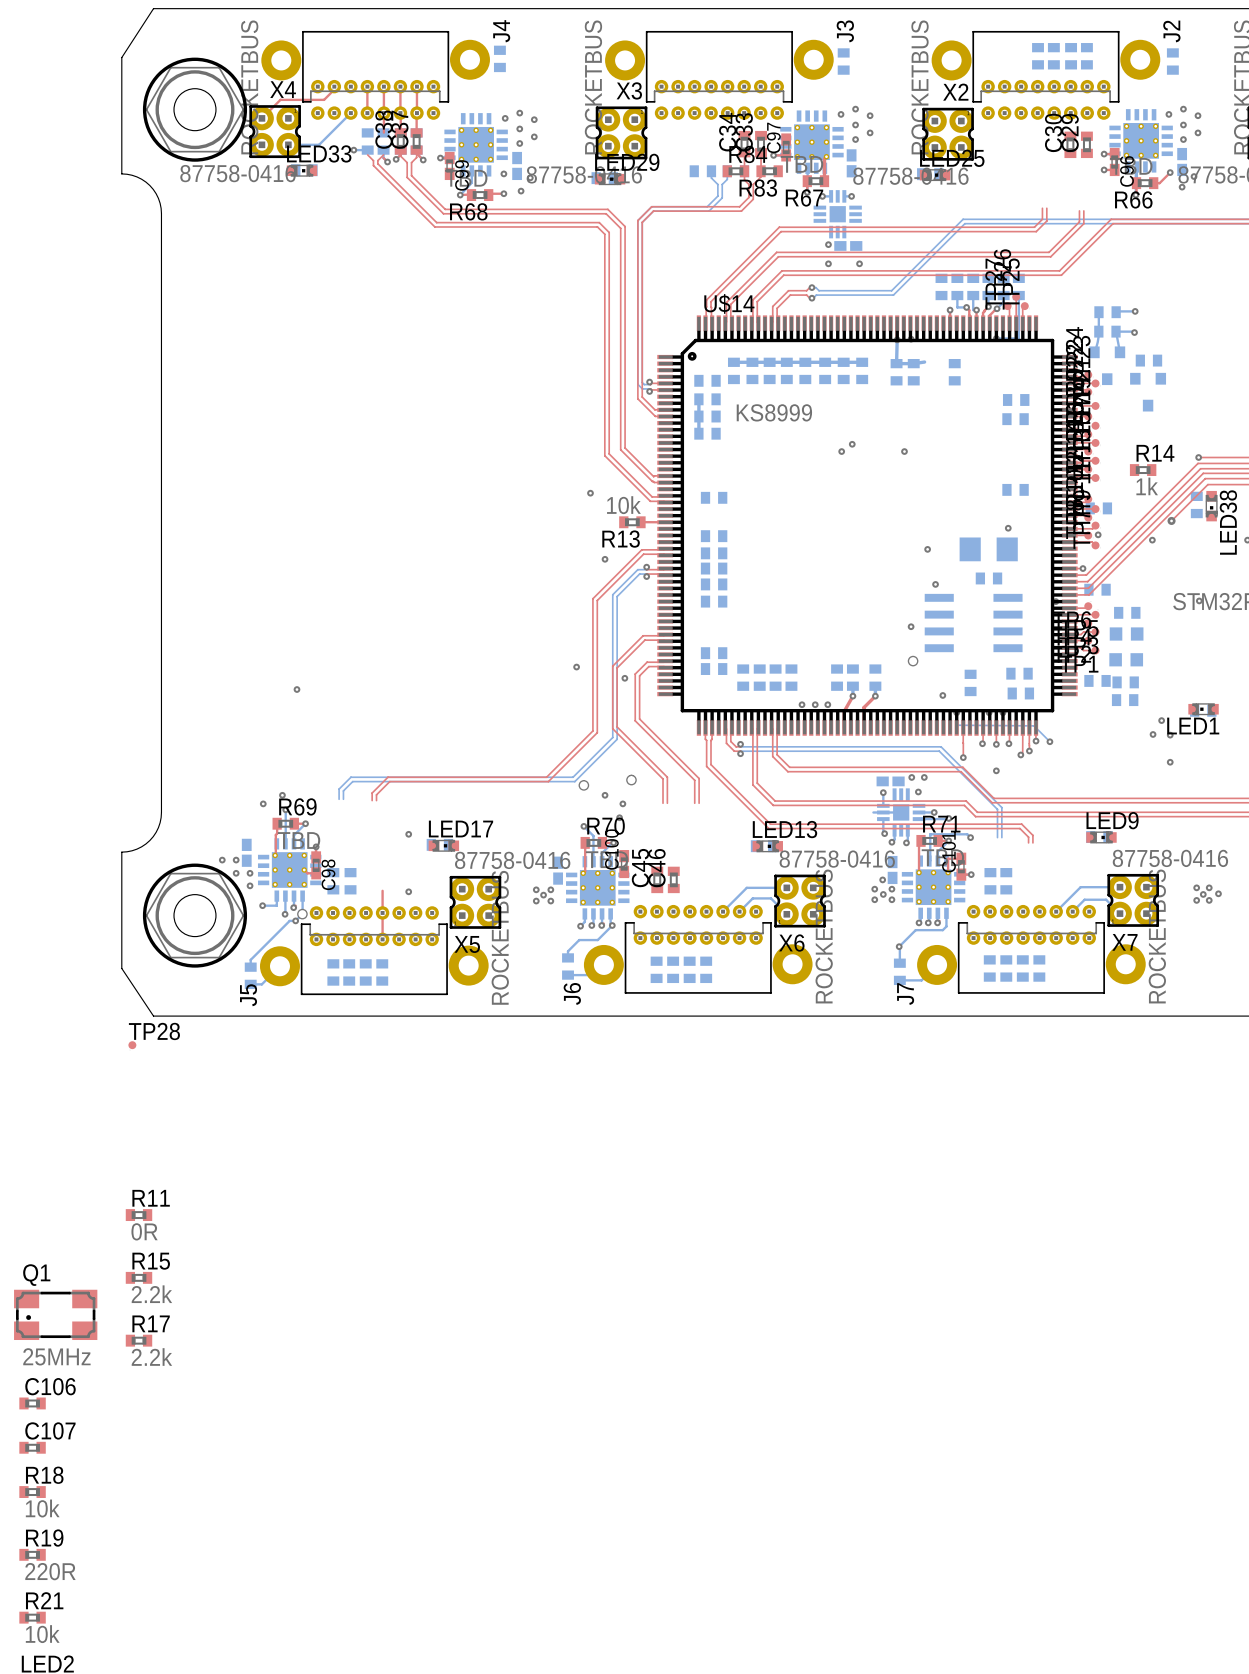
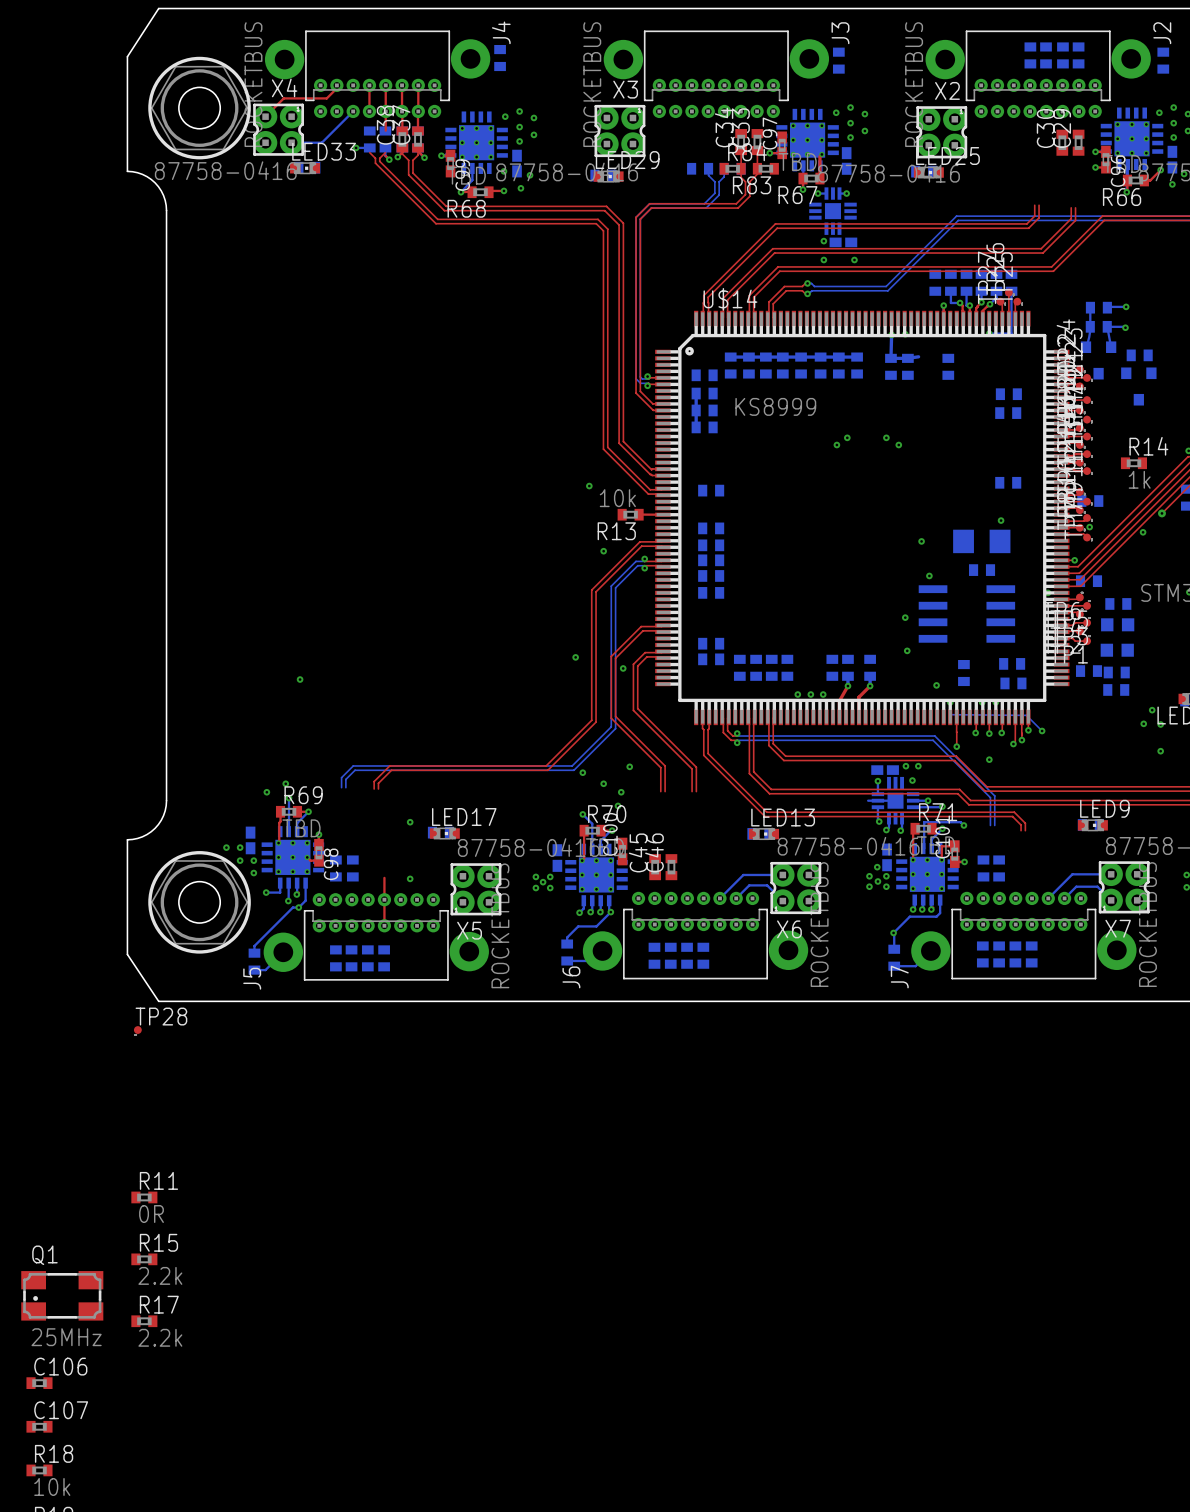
via: none -> (886, 437)
via: (913, 661) -> none
via: (631, 780) -> none
via: (583, 785) -> none
via: (302, 914) -> none

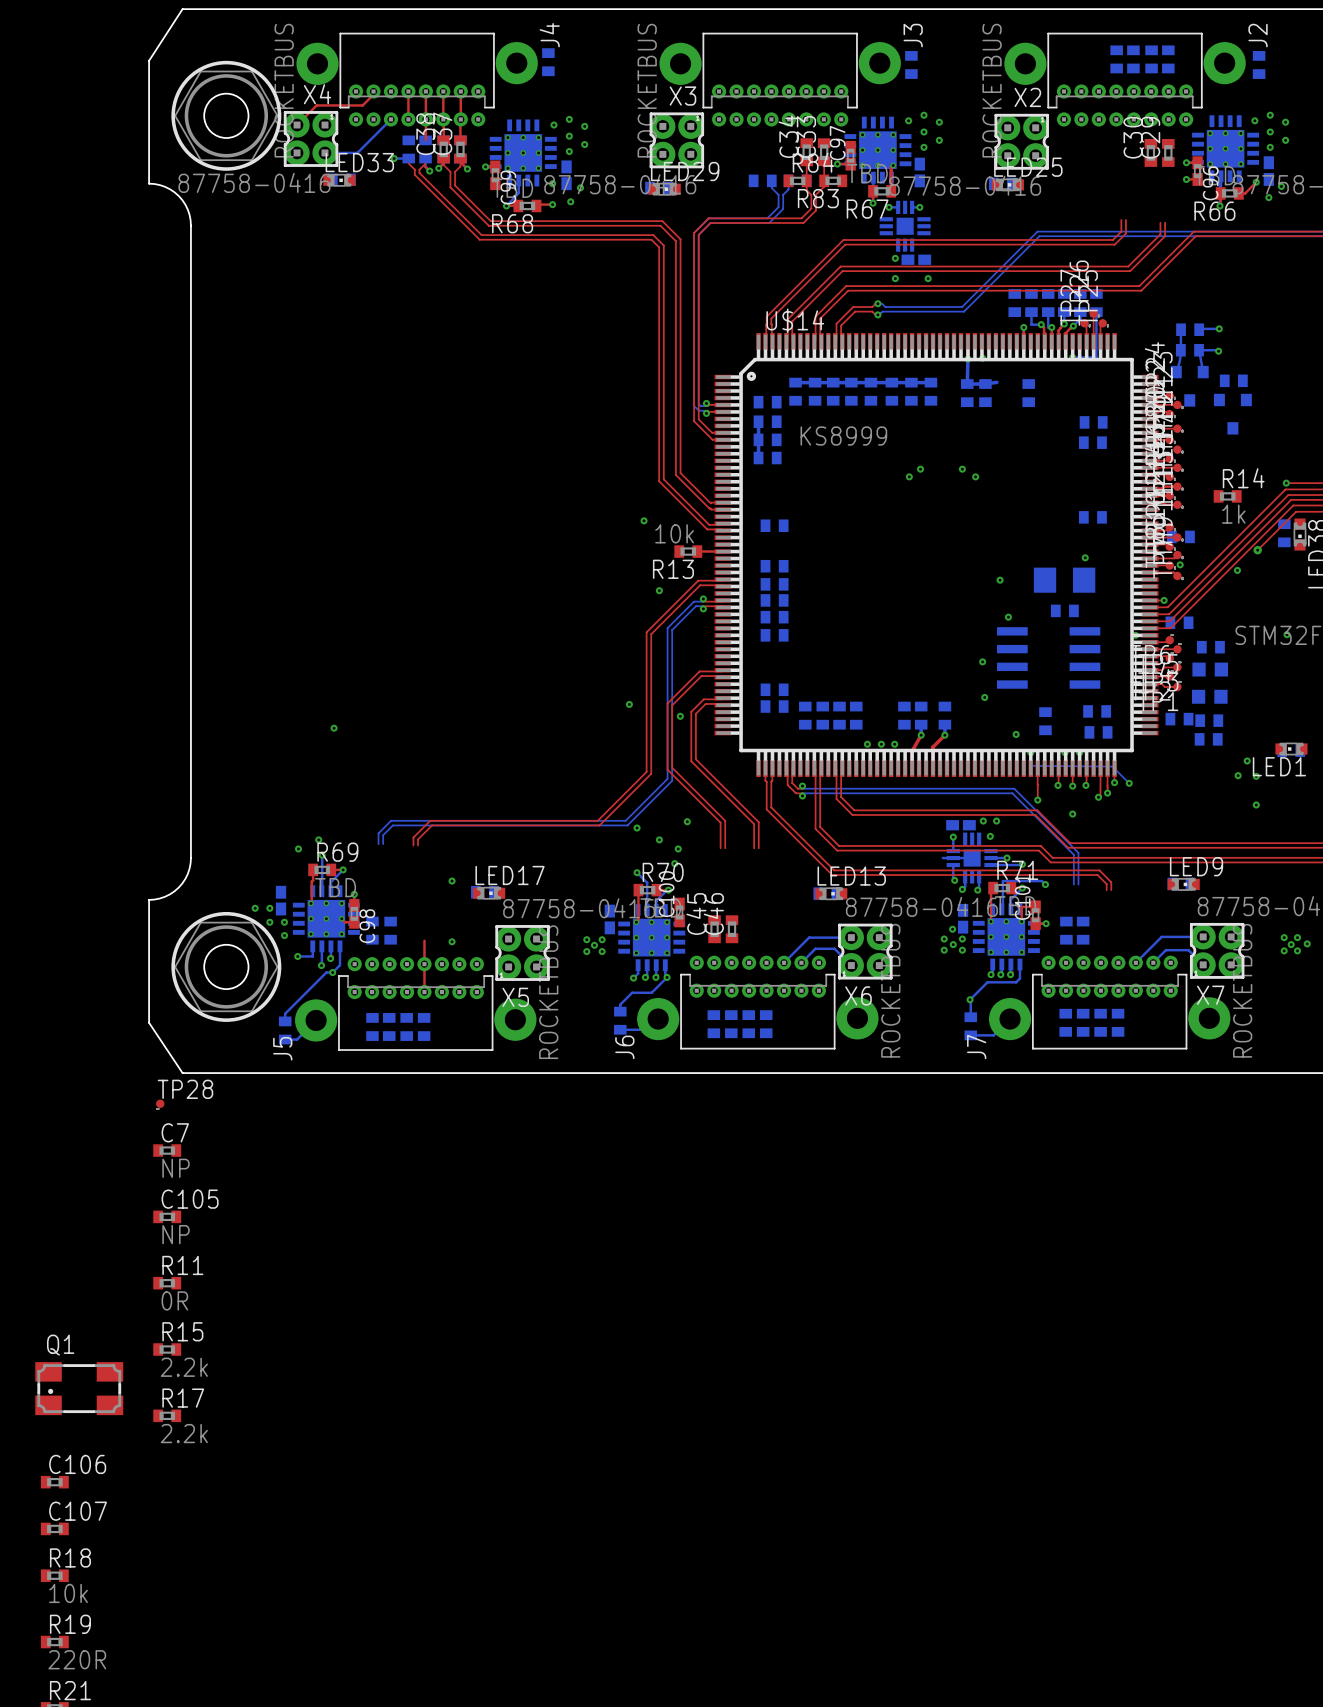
C7: none -> NP (167, 1150)
C105: none -> NP (167, 1216)
Q1 value: 25MHz (66, 1337) -> none

